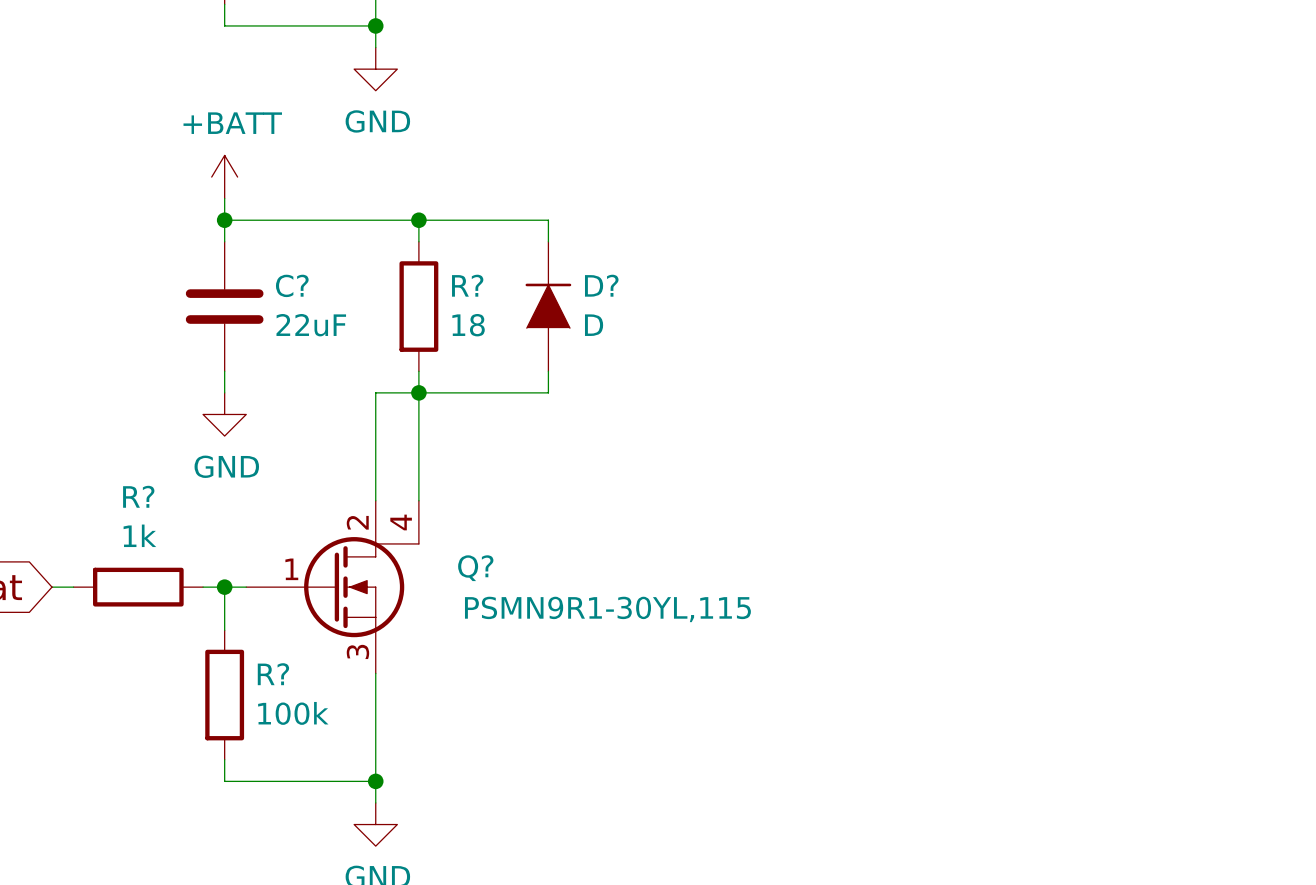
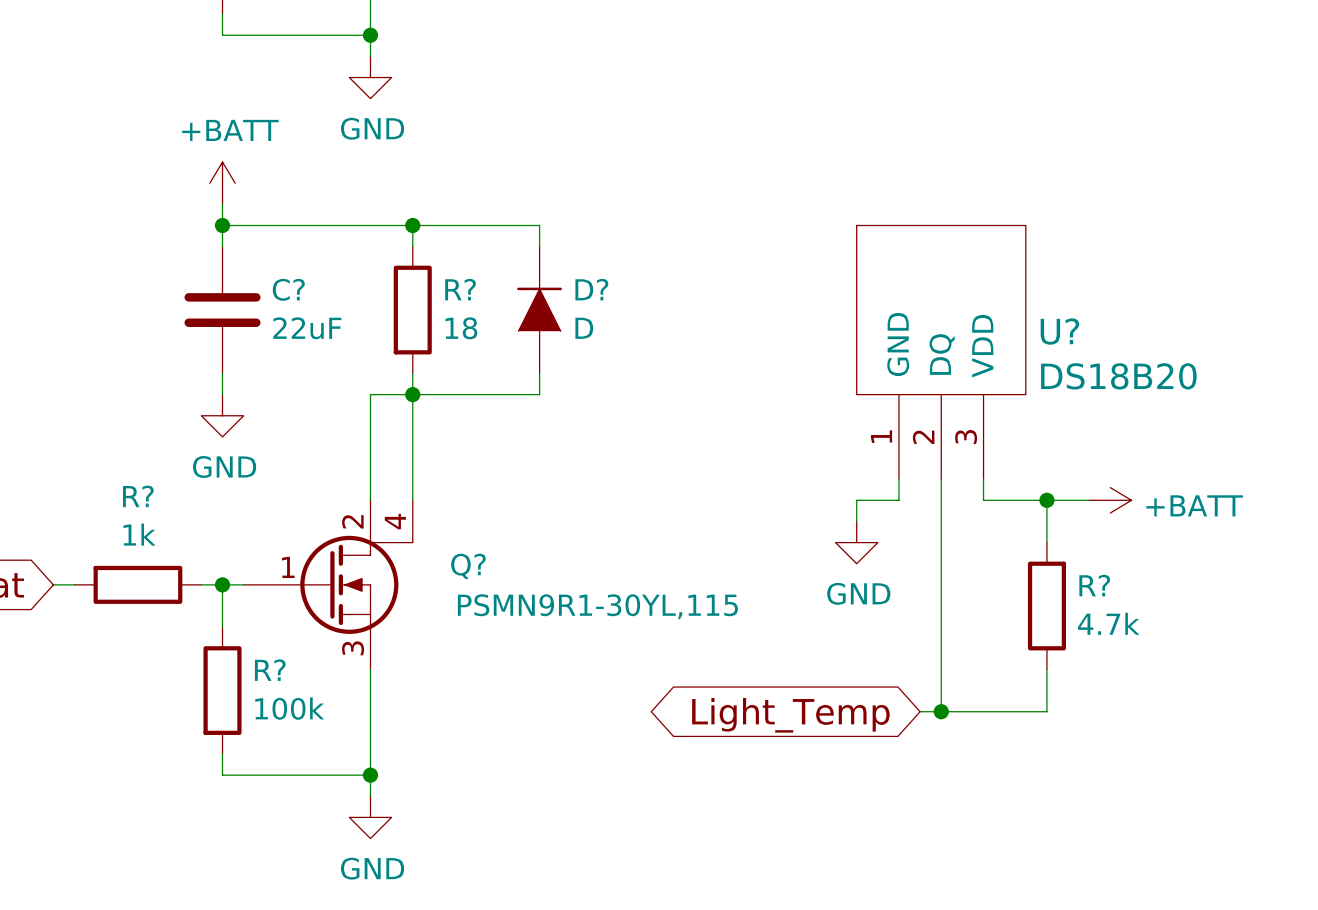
U?: none -> DS18B20 (941, 352)
wire: none -> (898, 479) (898, 500) (856, 500) (856, 521)
wire: none -> (941, 479) (941, 711)
wire: none -> (983, 479) (983, 500) (1089, 500)
wire: none -> (1046, 500) (1046, 542)
junction: none -> (1046, 500)
power symbol: none -> +BATT (1110, 500)
power symbol: none -> GND (856, 542)
R?: none -> 4.7k (1046, 606)
wire: none -> (1046, 669) (1046, 711) (920, 711)
junction: none -> (941, 711)
global label: none -> Light_Temp (790, 715)

